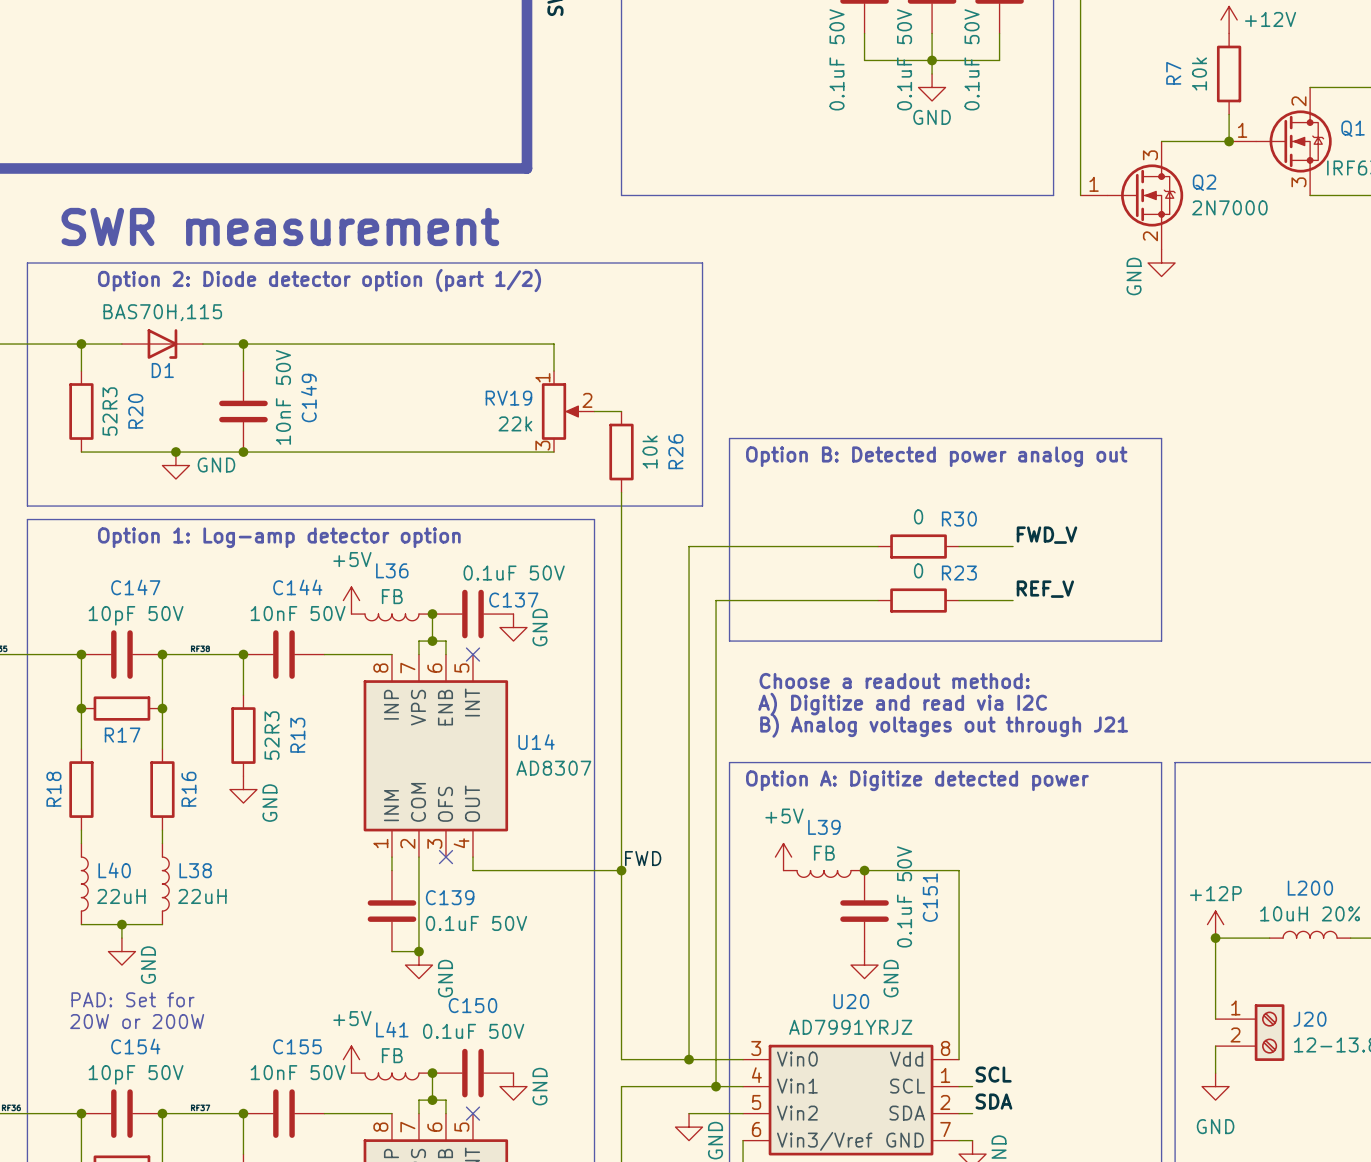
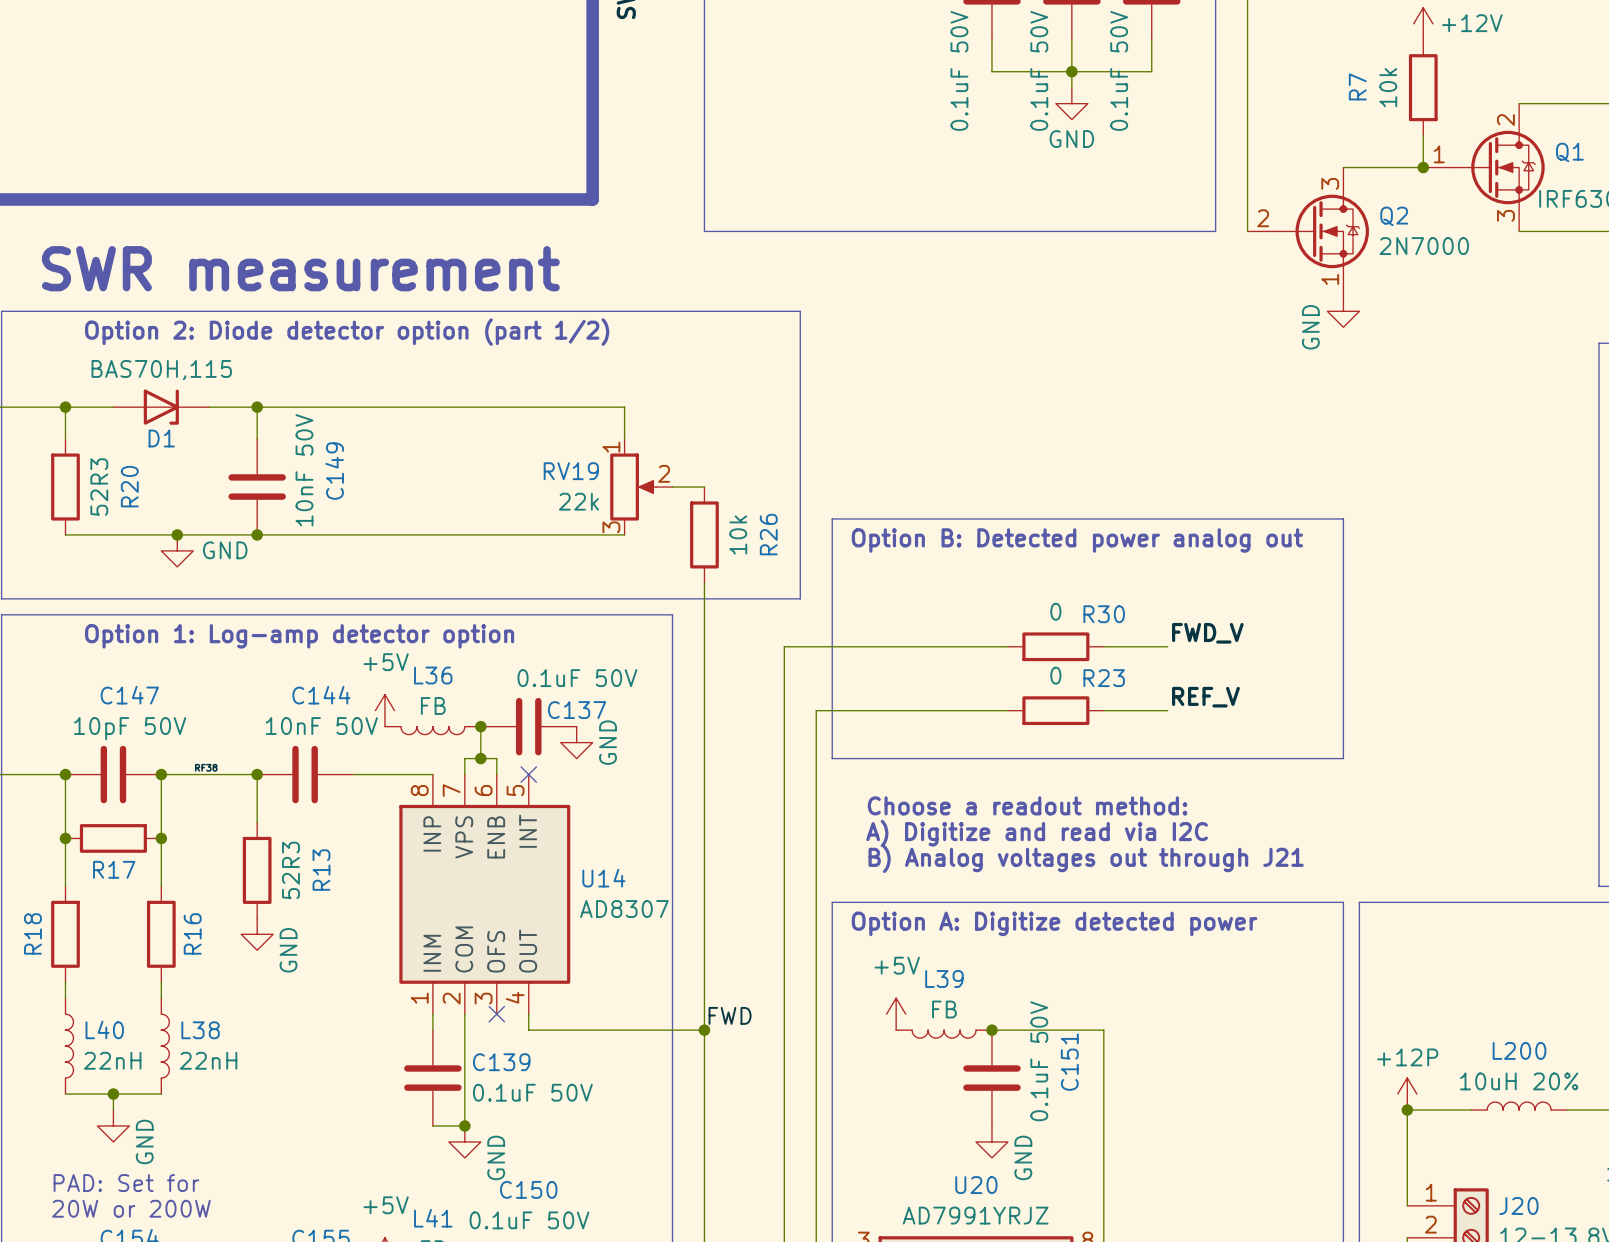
Q2 pin number: 1 (1094, 184) -> 2 (1263, 218)
Q2 pin number: 2 (1150, 236) -> 1 (1330, 279)
L40 value: 22uH (121, 896) -> 22nH (112, 1060)
L38 value: 22uH (202, 896) -> 22nH (208, 1060)

